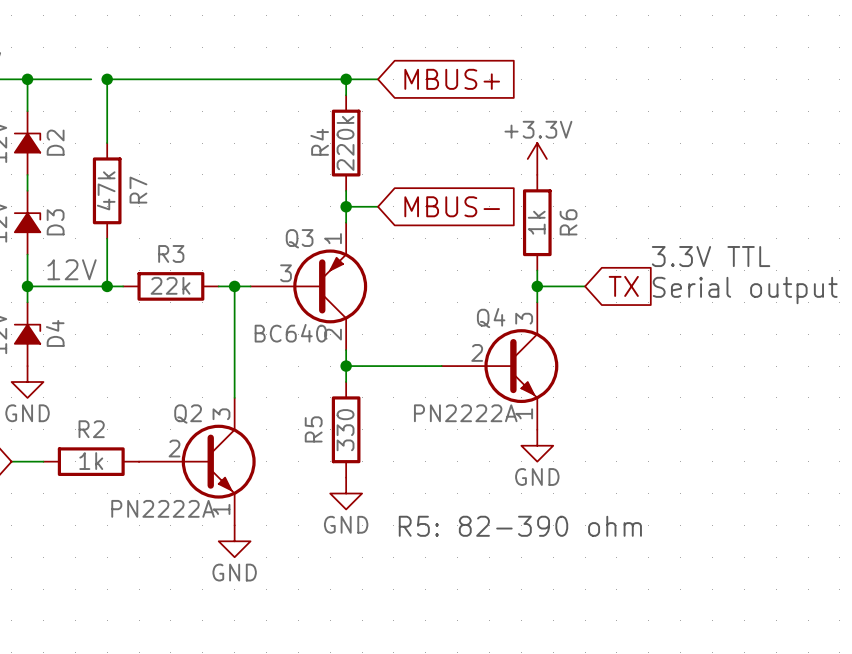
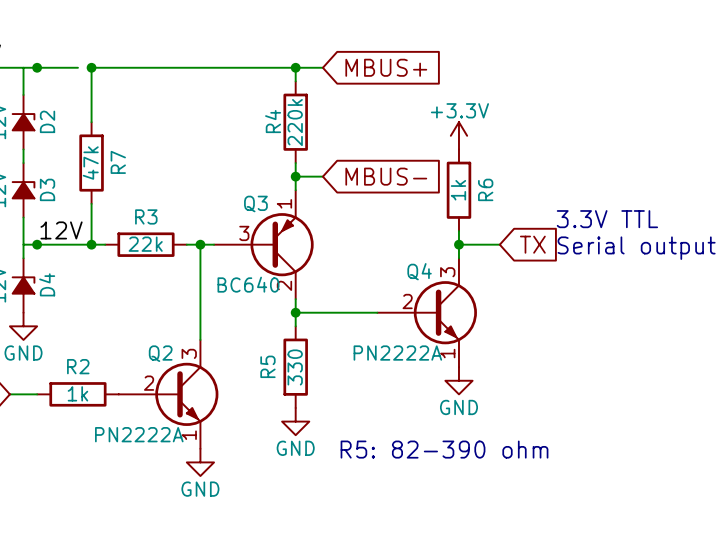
junction position: (27, 79) -> (37, 67)
junction position: (27, 286) -> (37, 244)

